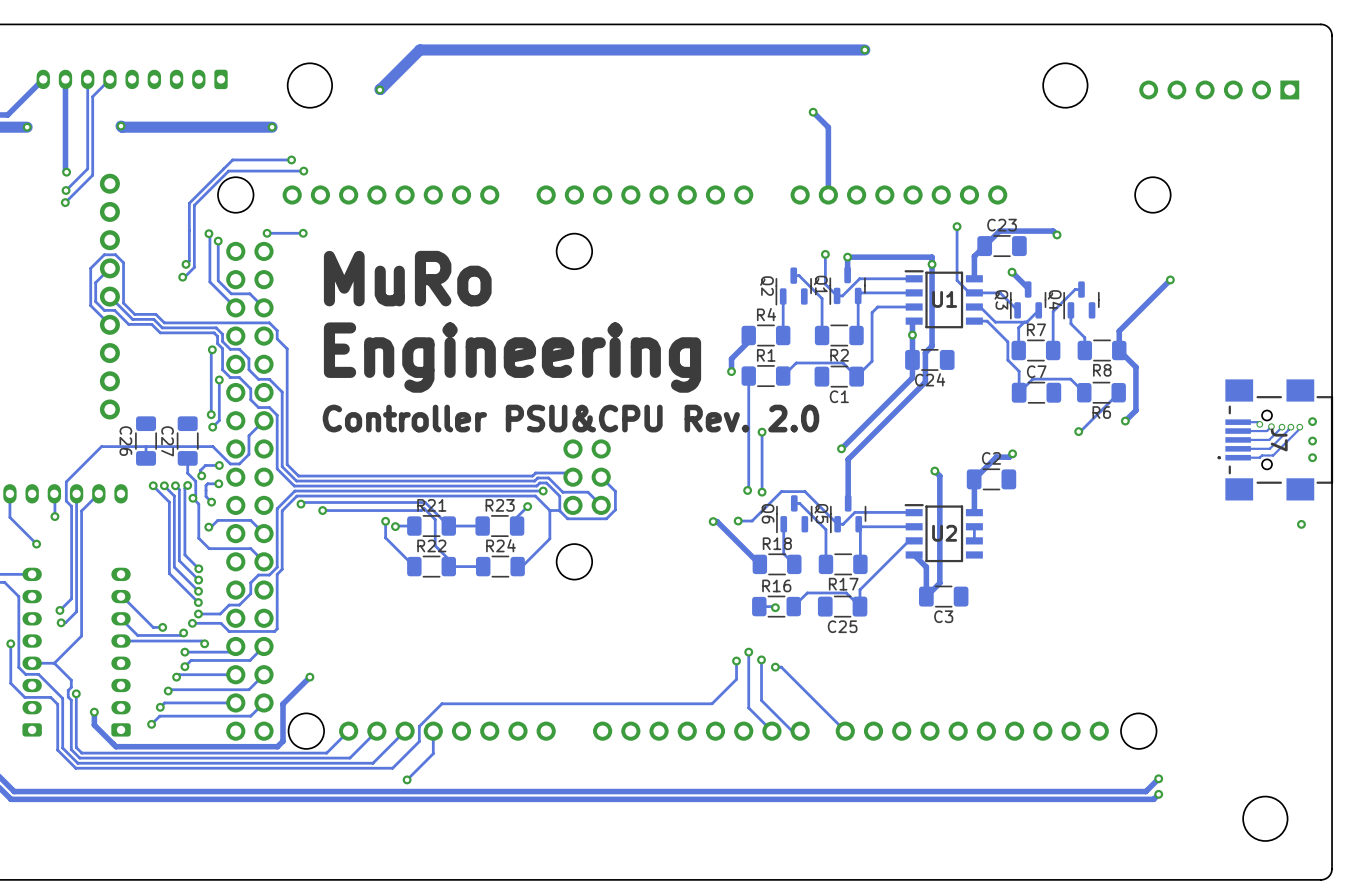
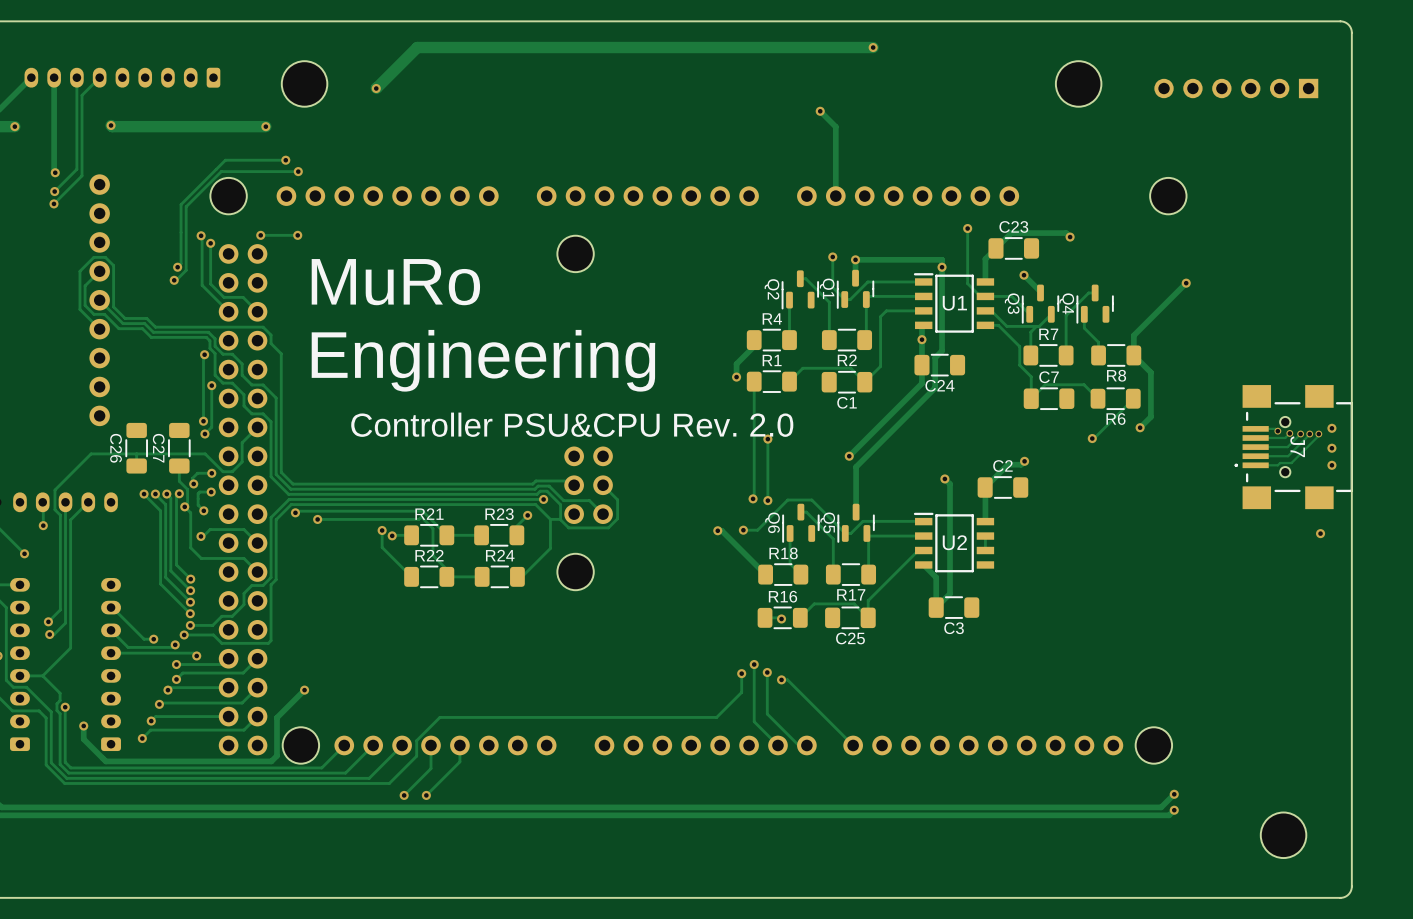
track: none -> (459, 745) (459, 761) (426, 795)
via: none -> (426, 795)

